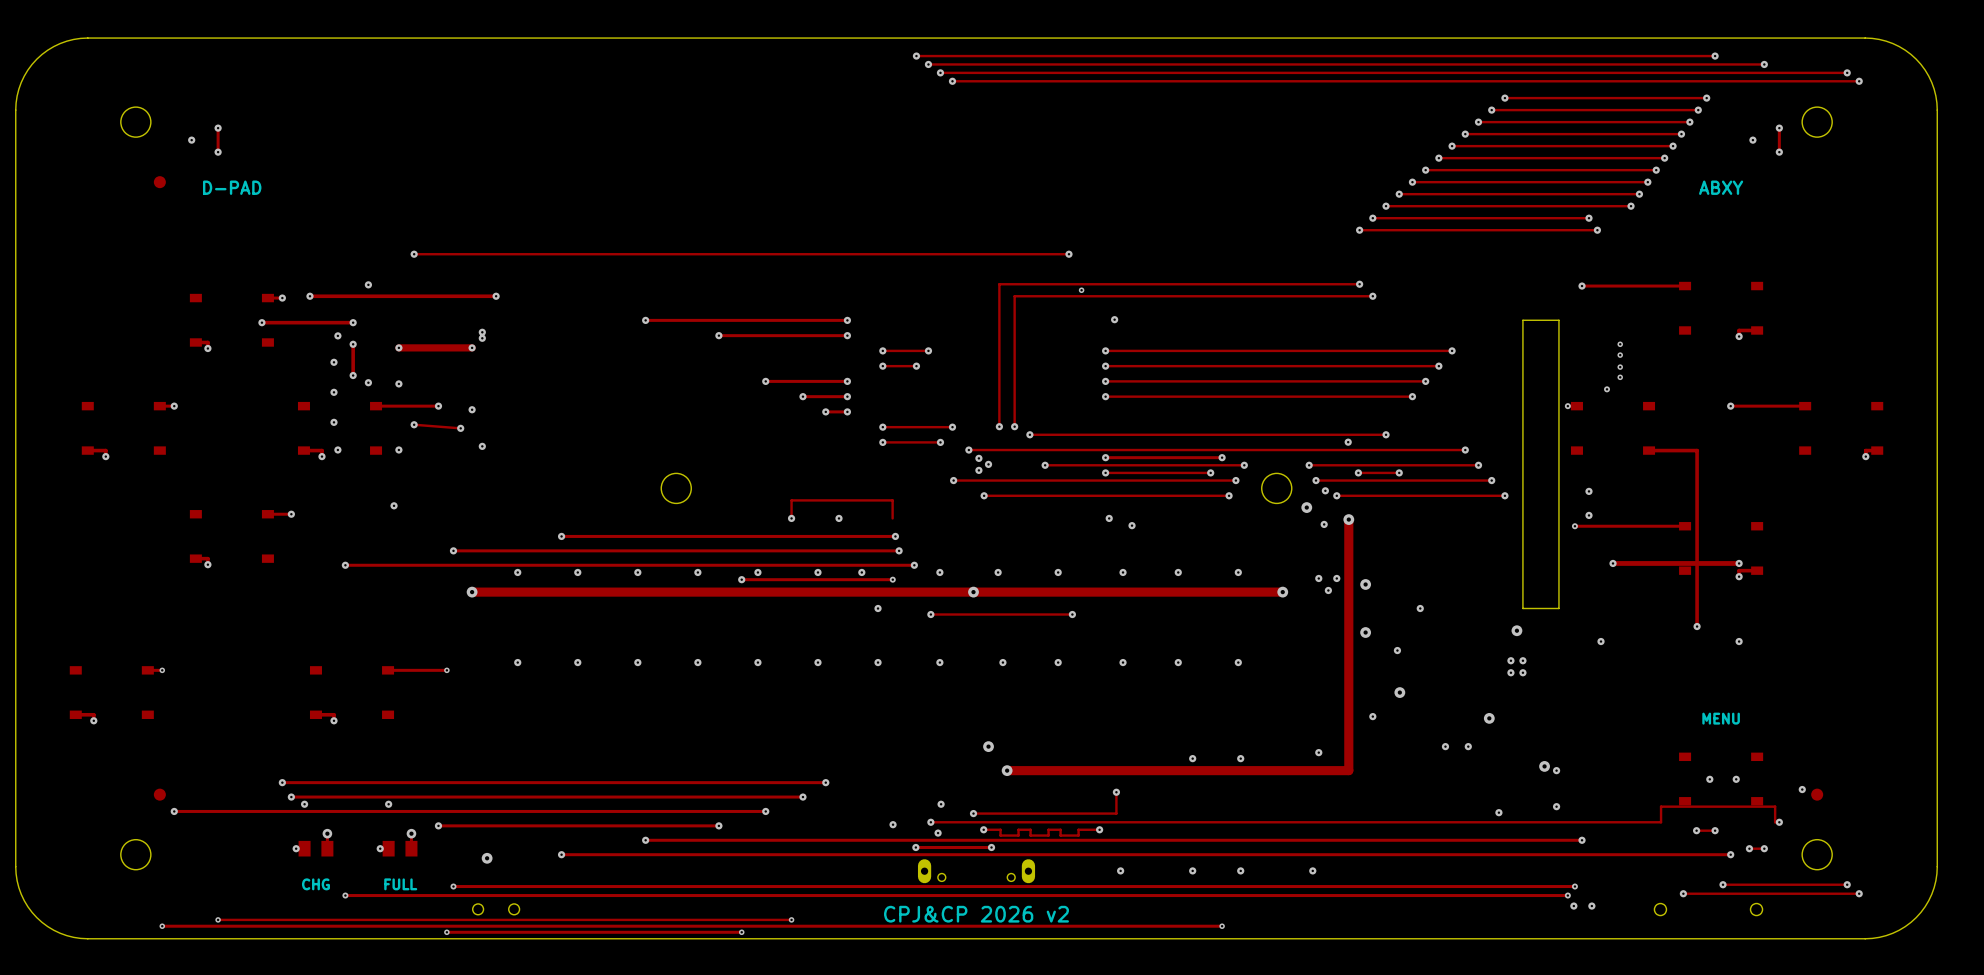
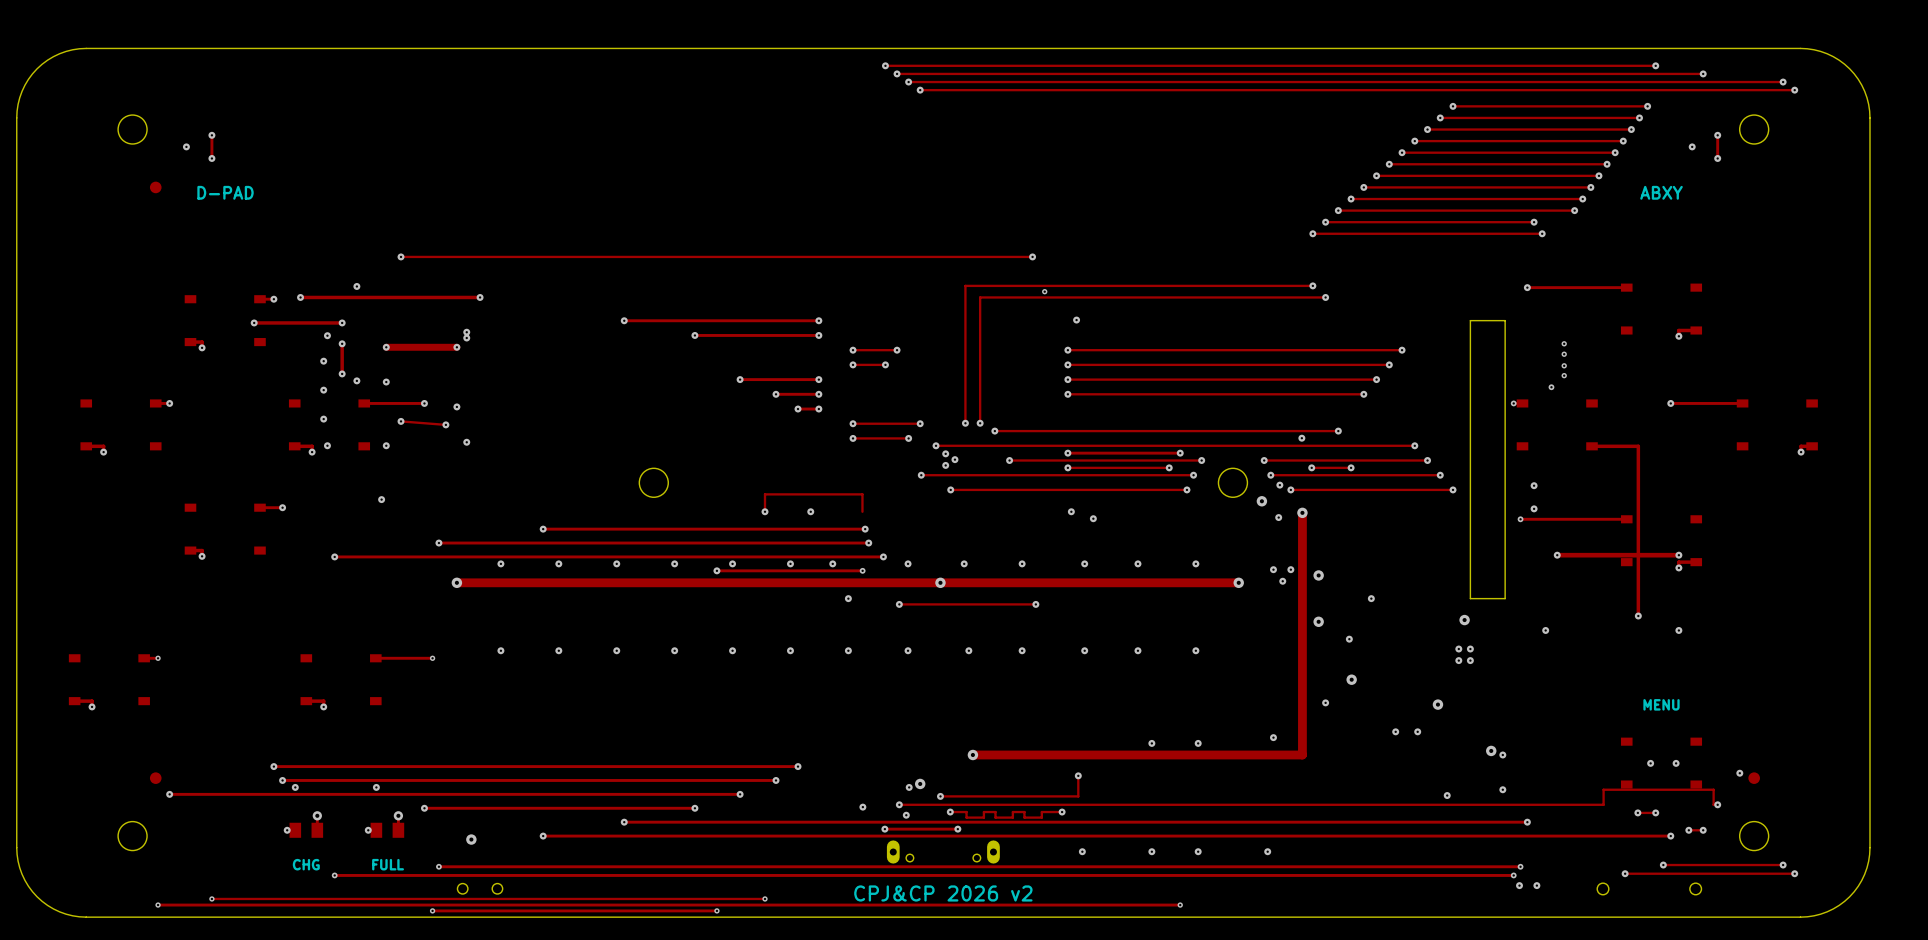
via position: (988, 746) -> (920, 783)

